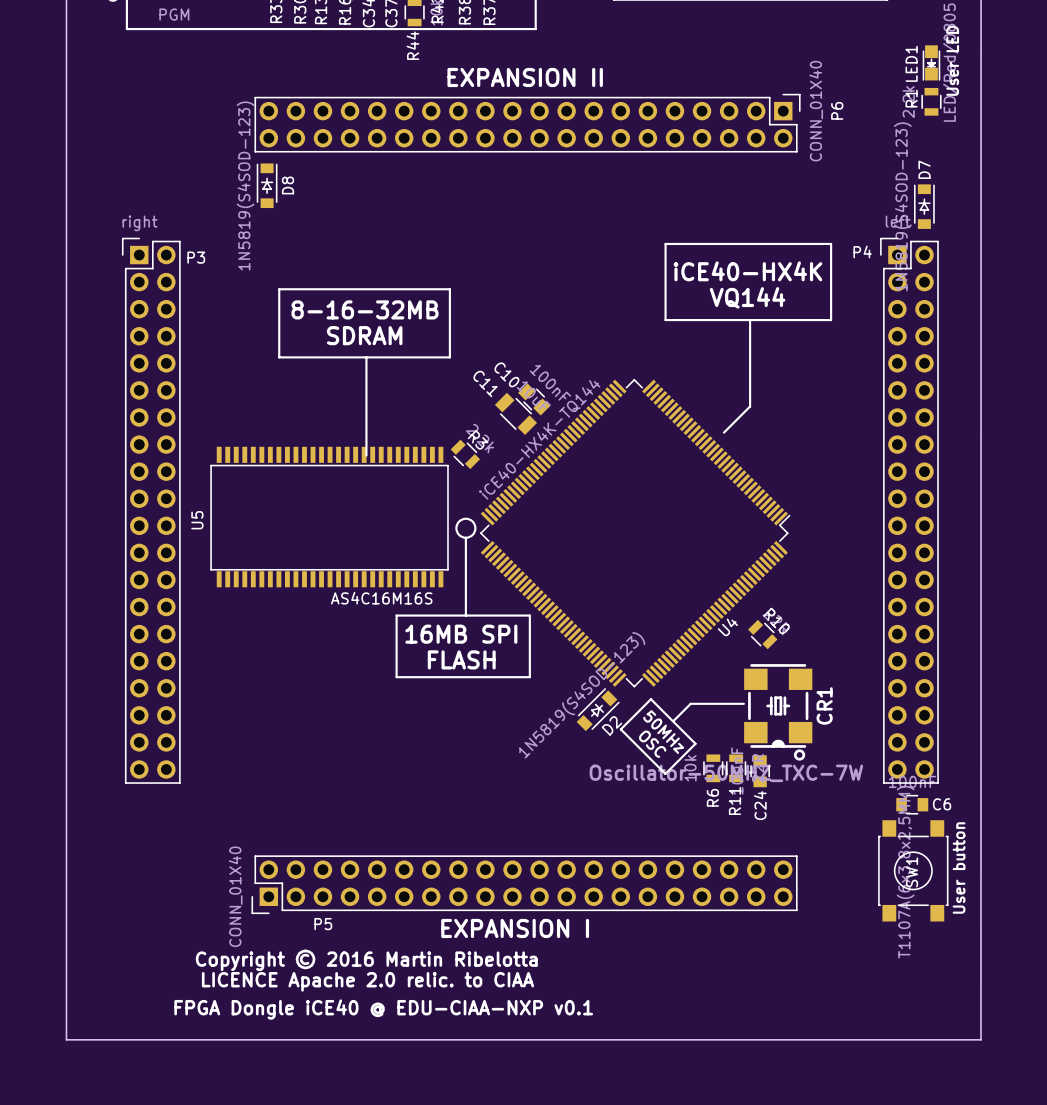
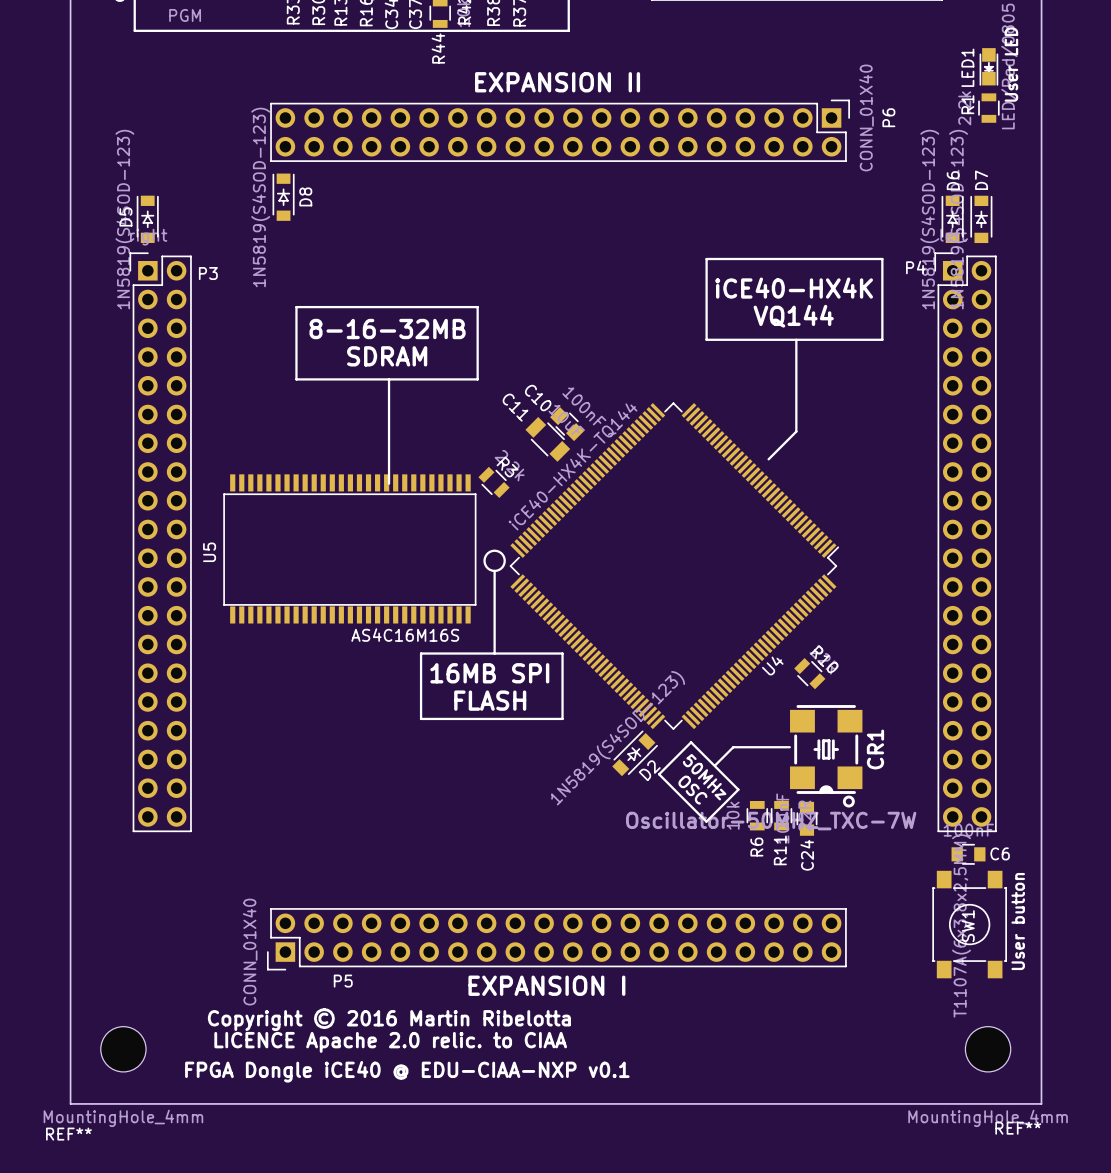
D5: none -> 1N5819(S4SOD-123) (147, 219)
D6: none -> 1N5819(S4SOD-123) (952, 219)
REF**: none -> MountingHole_4mm (123, 1049)
REF**: none -> MountingHole_4mm (988, 1049)

